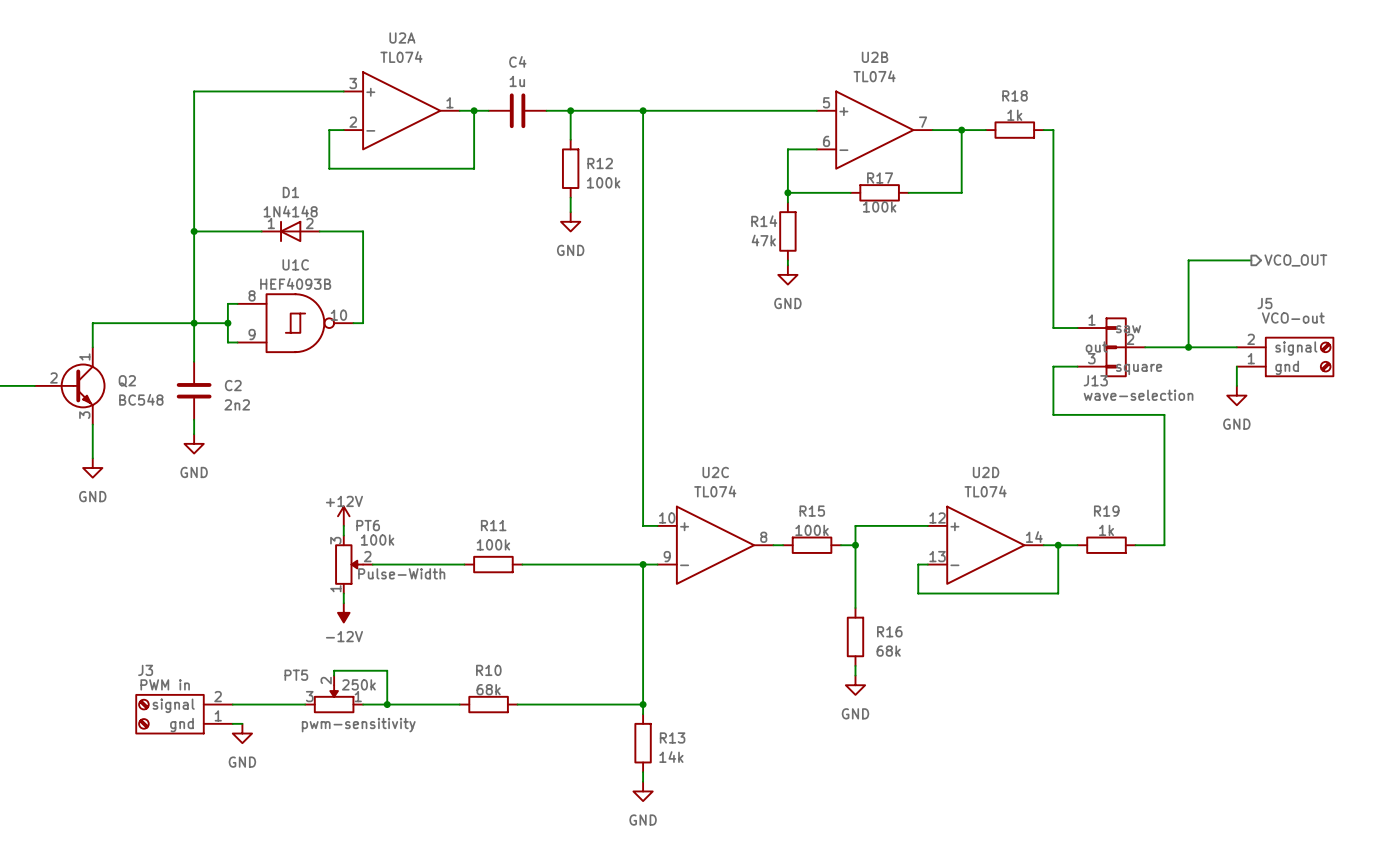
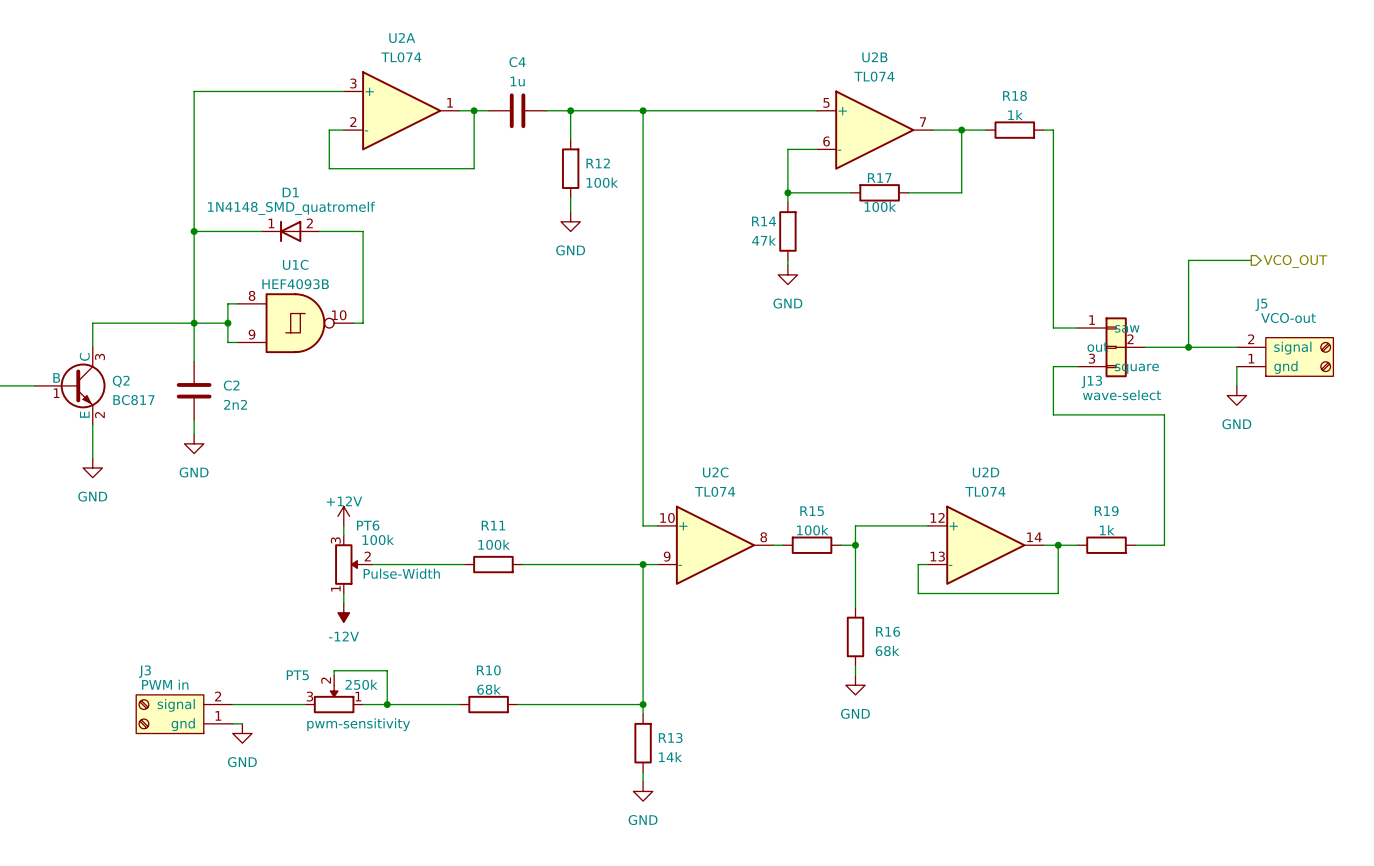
D1 value: 1N4148 (290, 211) -> 1N4148_SMD_quatromelf (291, 208)
Q2 symbol: [34, 347, 106, 425] -> [34, 347, 106, 425]
J13 value: wave-selection (1138, 395) -> wave-select (1122, 395)
Q2 value: BC548 (141, 399) -> BC817 (133, 400)

